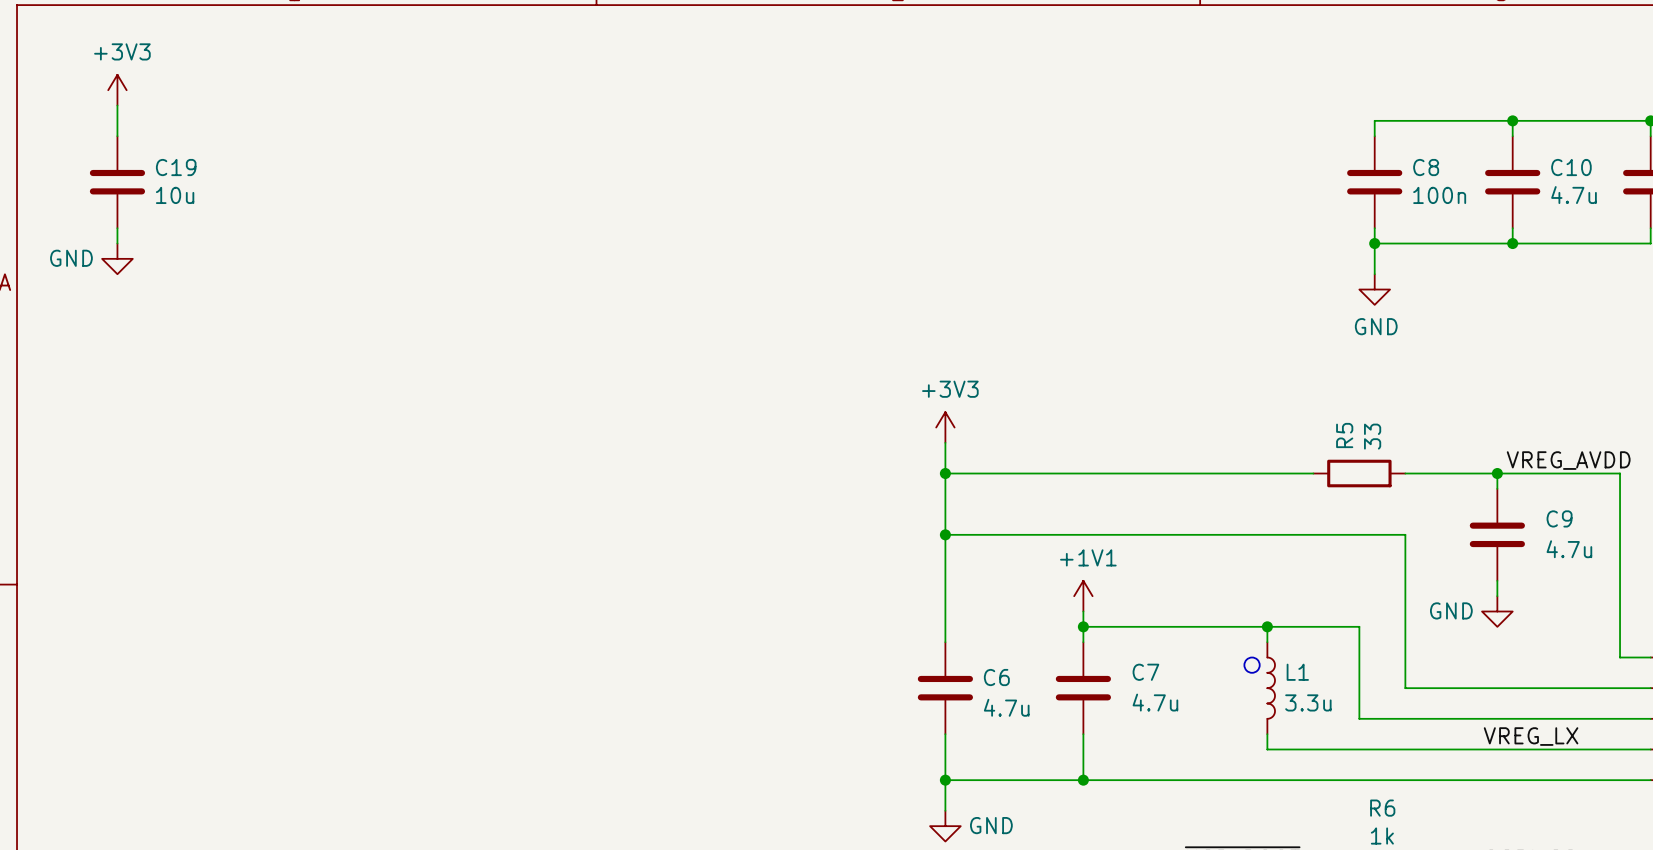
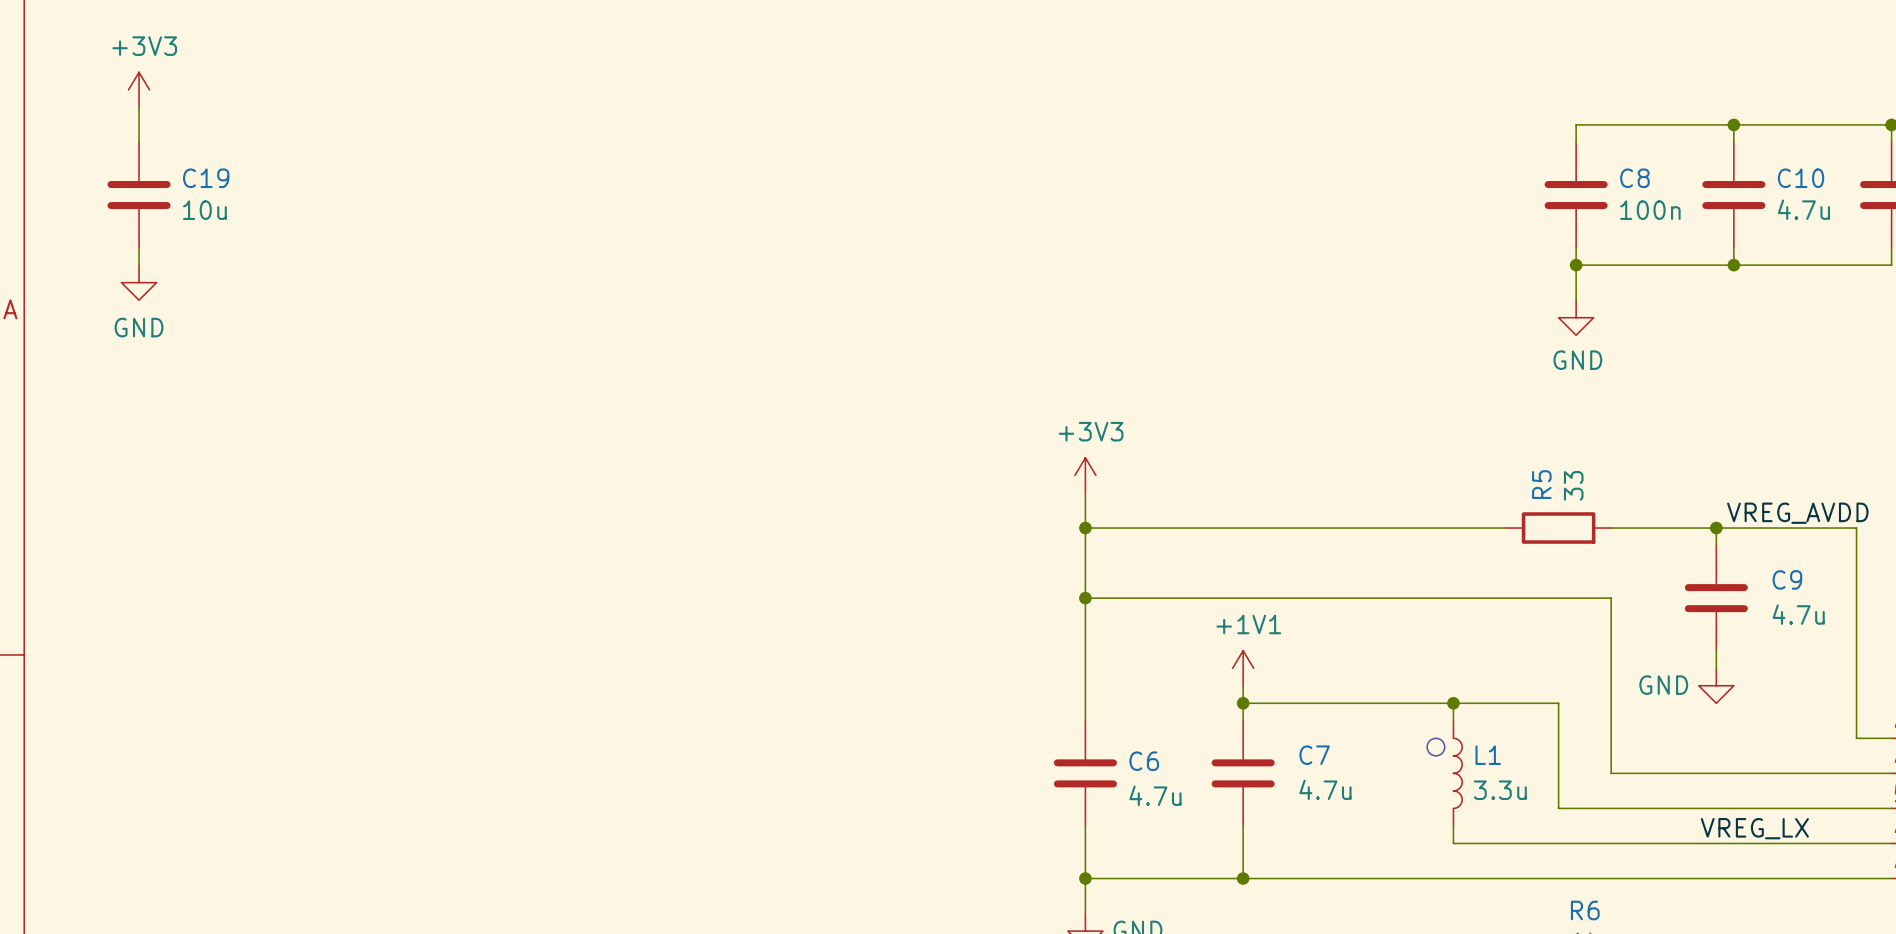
power symbol text position: GND (71, 258) -> GND (139, 327)

